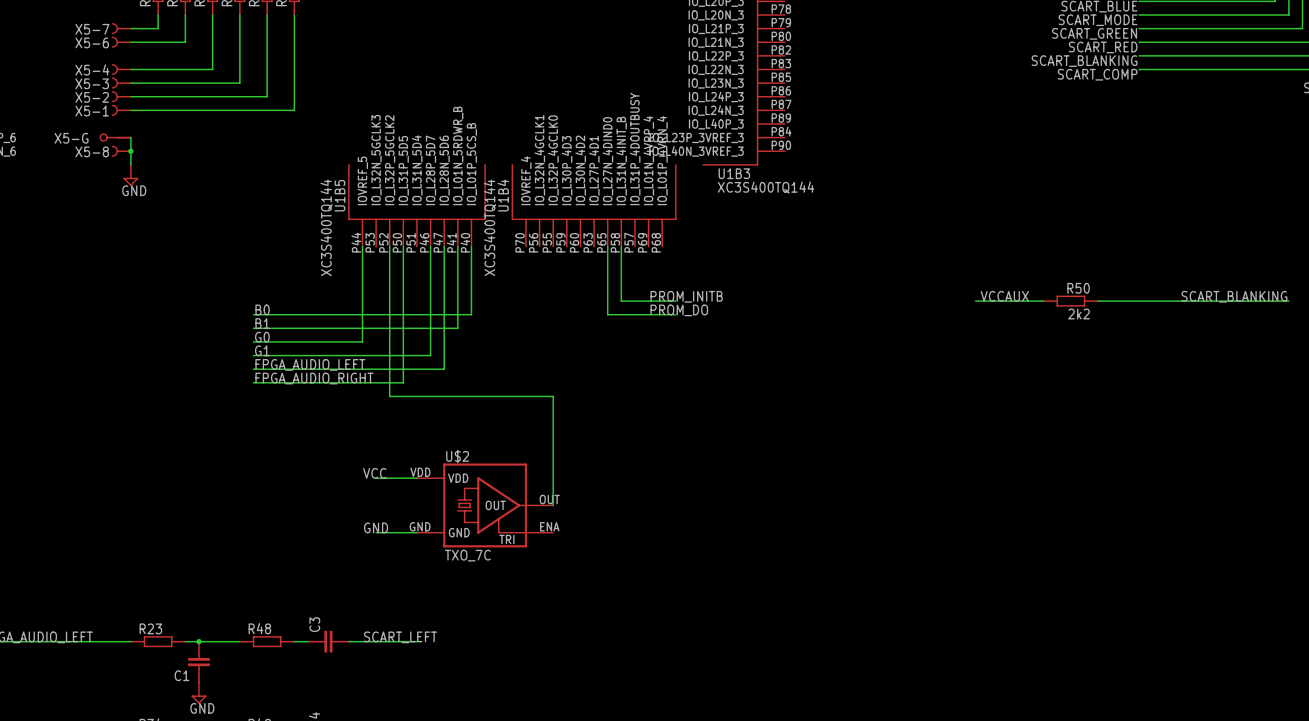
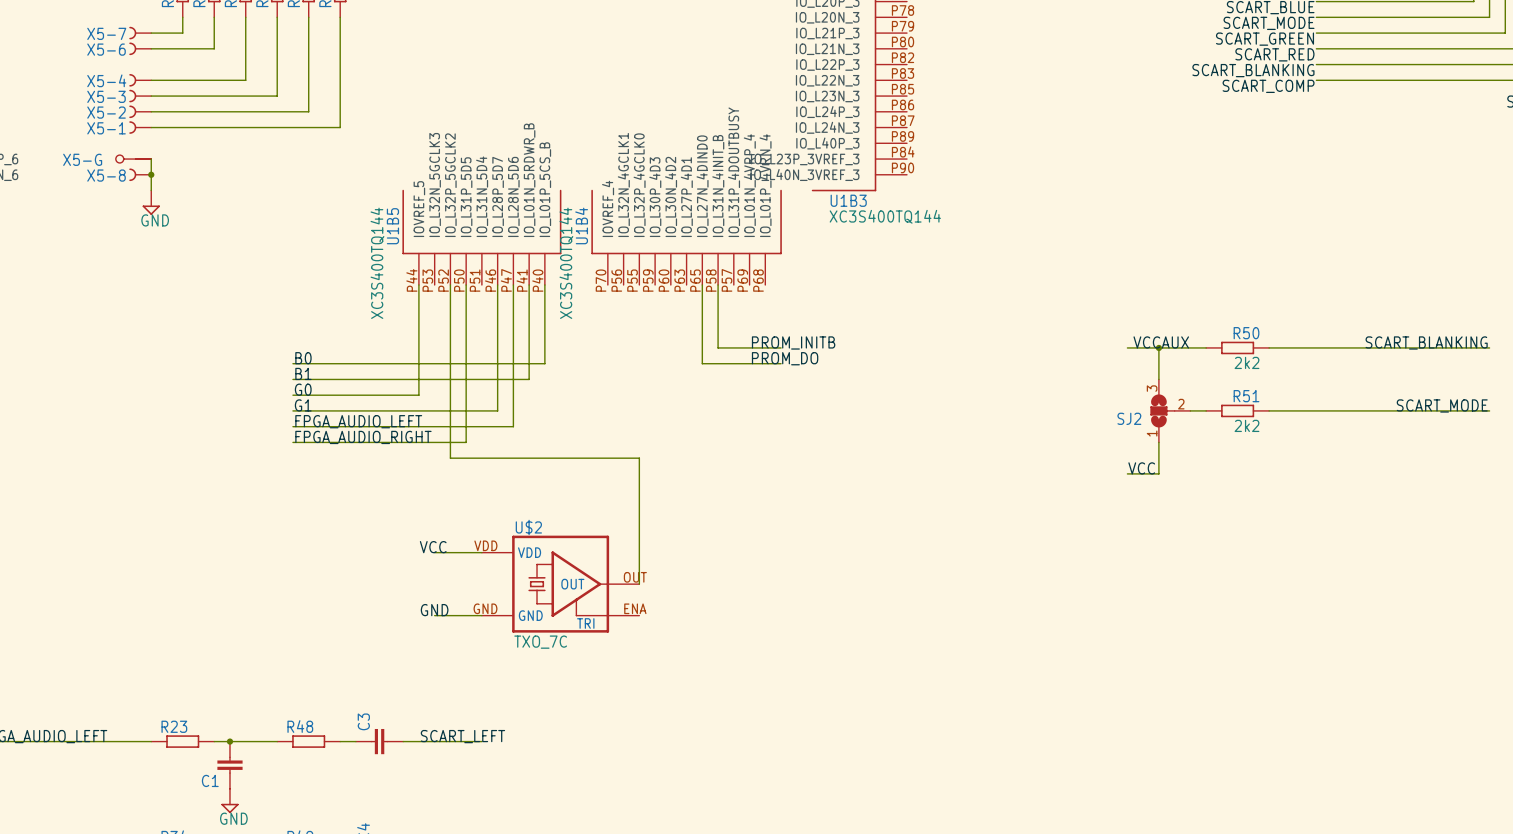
wire: none -> (1158, 347) (1158, 379)
junction: none -> (1158, 347)
label: none -> SCART_MODE (1442, 405)
SJ2: none -> (1170, 410)
wire: none -> (1190, 410) (1206, 410)
R51: none -> 2k2 (1237, 410)
wire: none -> (1269, 410) (1489, 410)
wire: none -> (1158, 442) (1158, 473) (1127, 473)
label: none -> VCC (1141, 468)

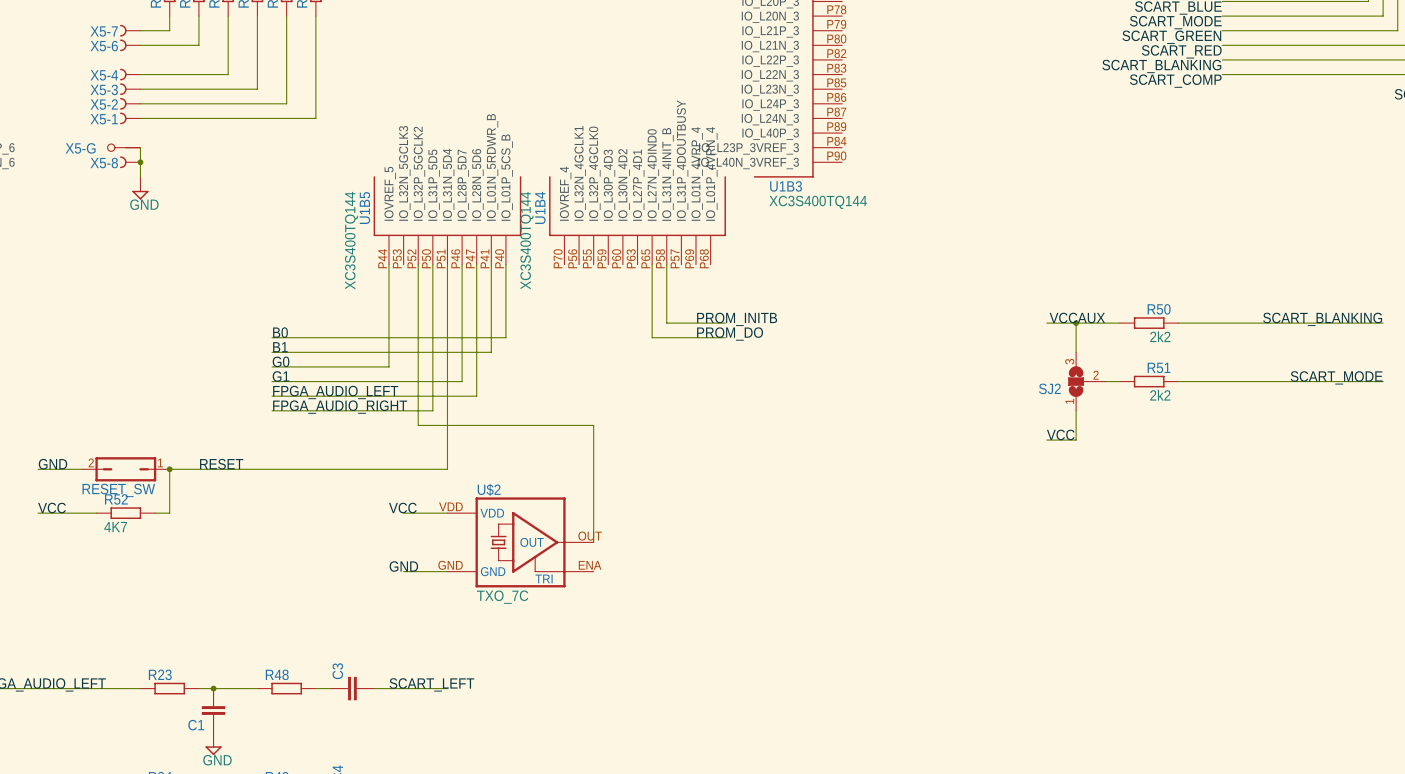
wire: none -> (447, 264) (447, 469) (169, 469) (169, 513) (155, 513)
label: none -> GND (53, 464)
label: none -> RESET (221, 464)
wire: none -> (38, 469) (81, 469)
RESET_SW: none -> (125, 469)
junction: none -> (169, 469)
label: none -> VCC (52, 508)
wire: none -> (38, 513) (96, 513)
R52: none -> 4K7 (125, 513)

